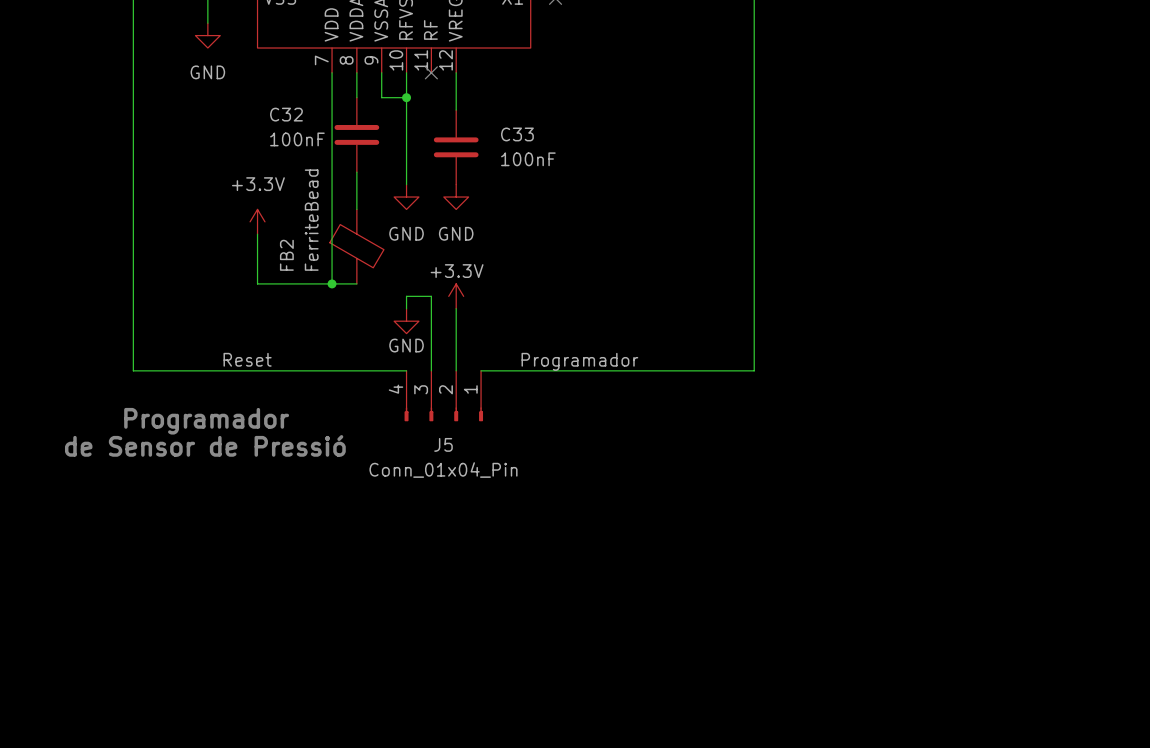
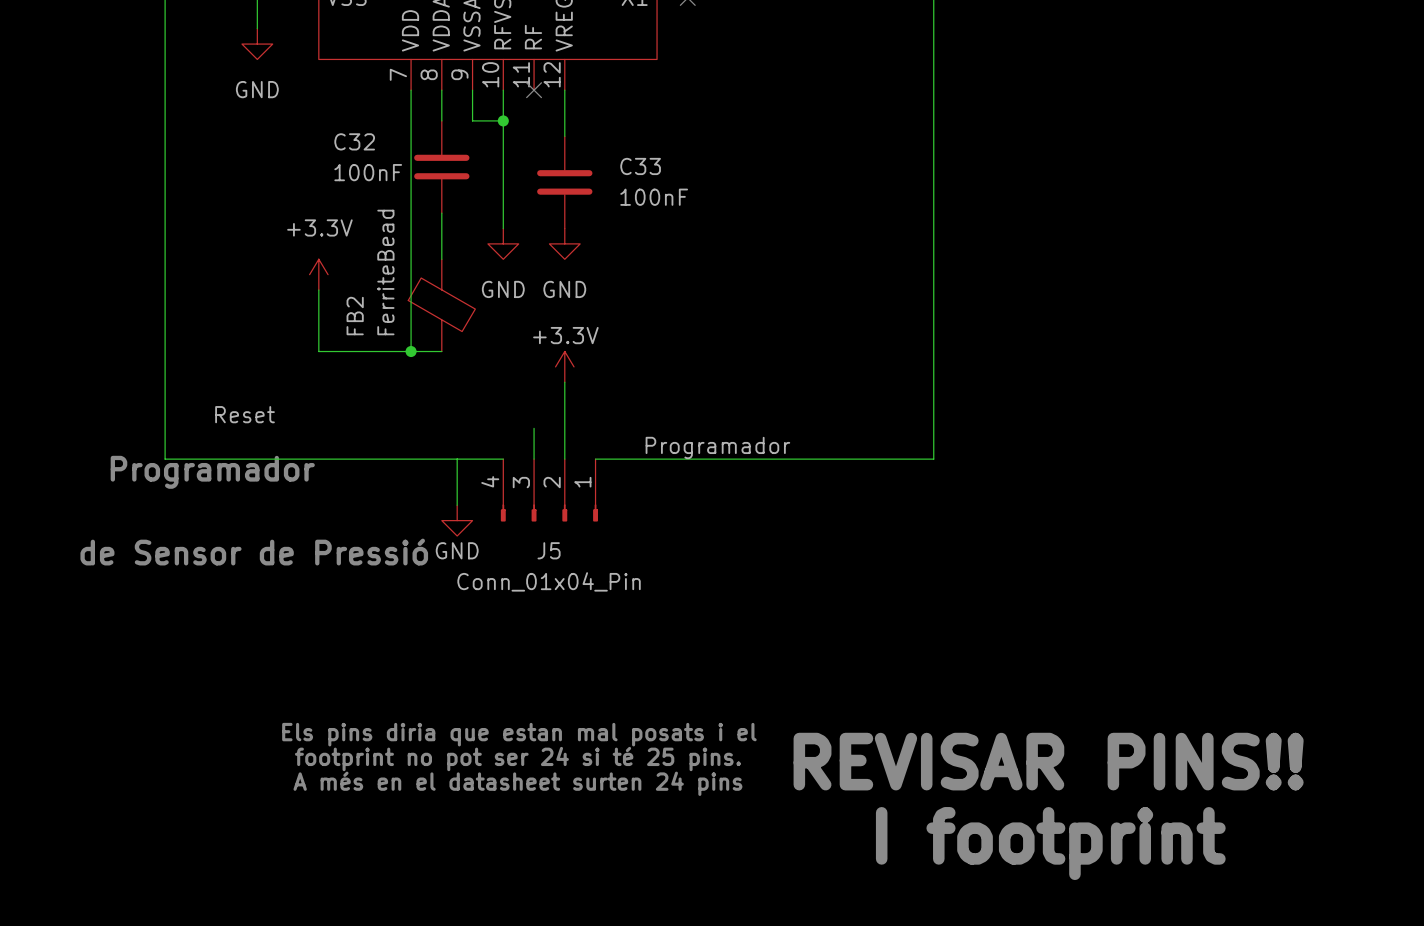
wire: (406, 308) (406, 296) (431, 296) (431, 346) -> none
power symbol position: GND (406, 321) -> GND (457, 520)
label position: Reset (247, 359) -> Reset (245, 414)
wire: none -> (457, 459) (457, 505)
text position: Programador (206, 421) -> Programador (212, 472)
text: none -> Els pins diria que estan mal posats i el (519, 734)
text: none -> footprint no pot ser 24 si té 25 pins. (517, 759)
text: none -> REVISAR PINS!! (1048, 761)
text: none -> A més en el datasheet surten 24 pins (517, 783)
text: none -> I footprint (1050, 843)

